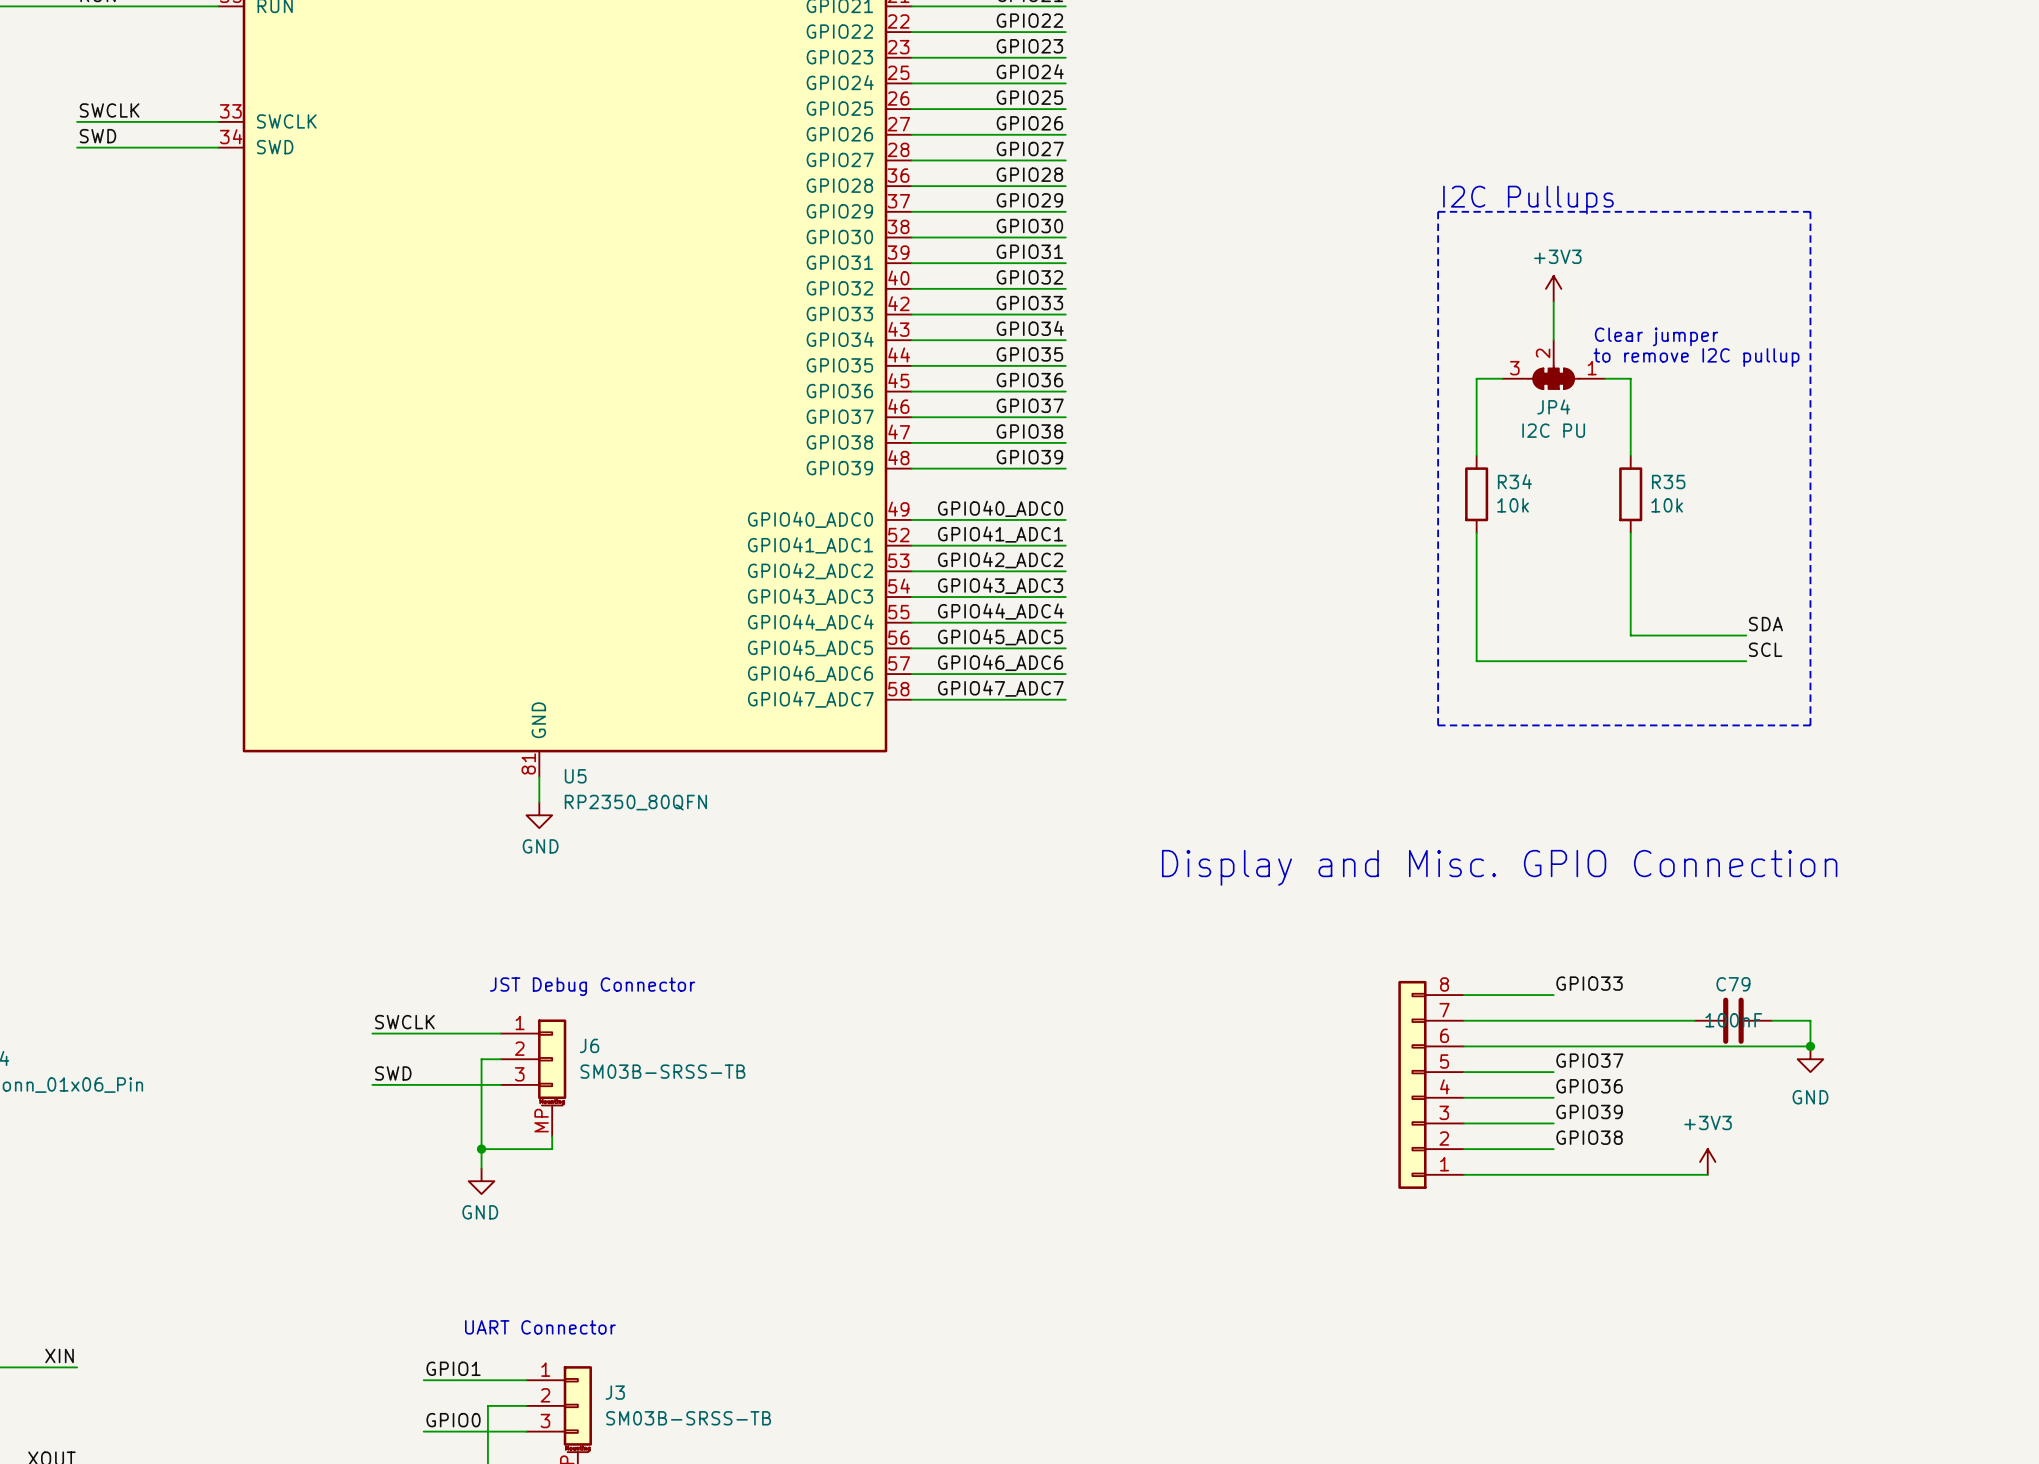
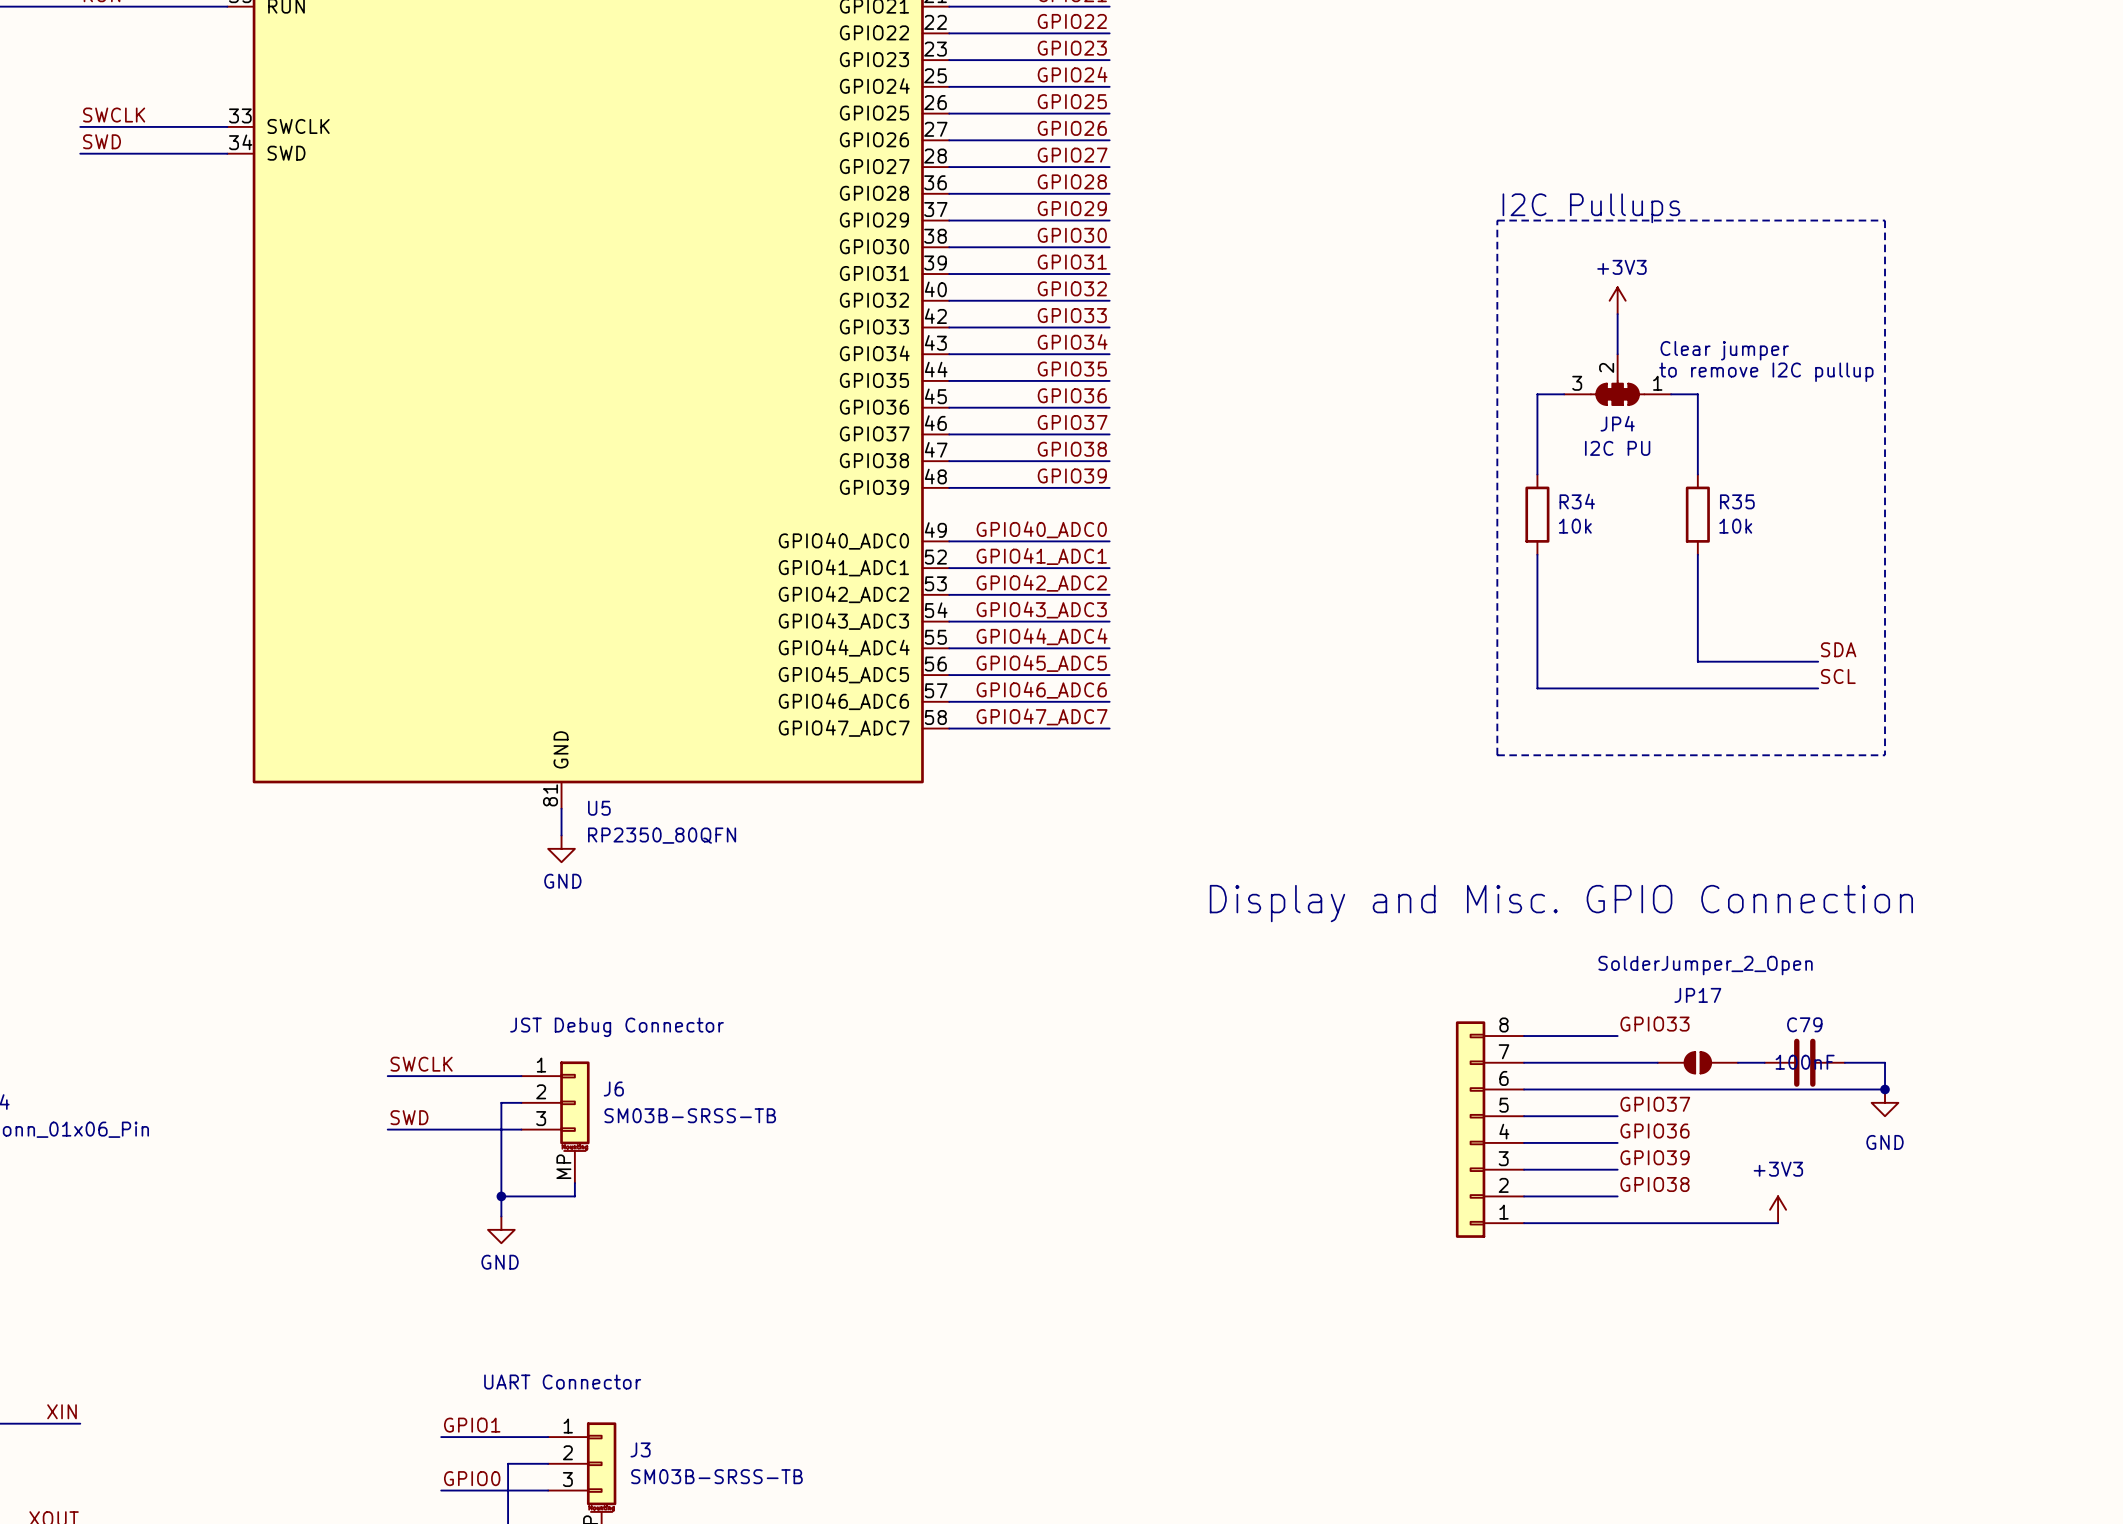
JP17: none -> SolderJumper_2_Open (1697, 1062)

